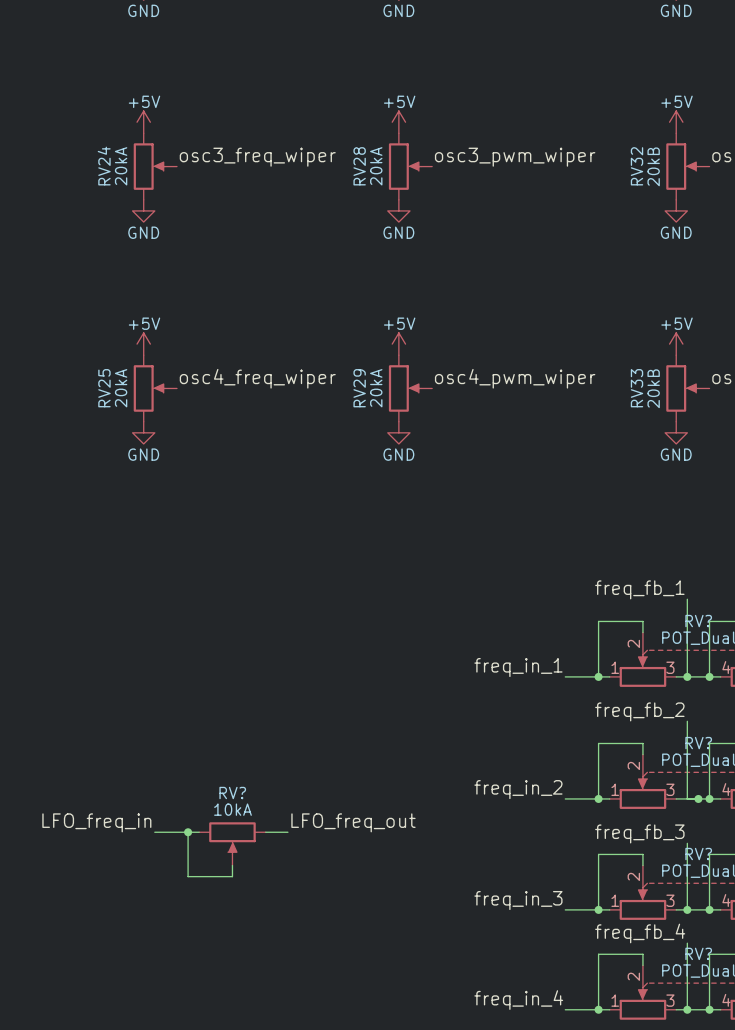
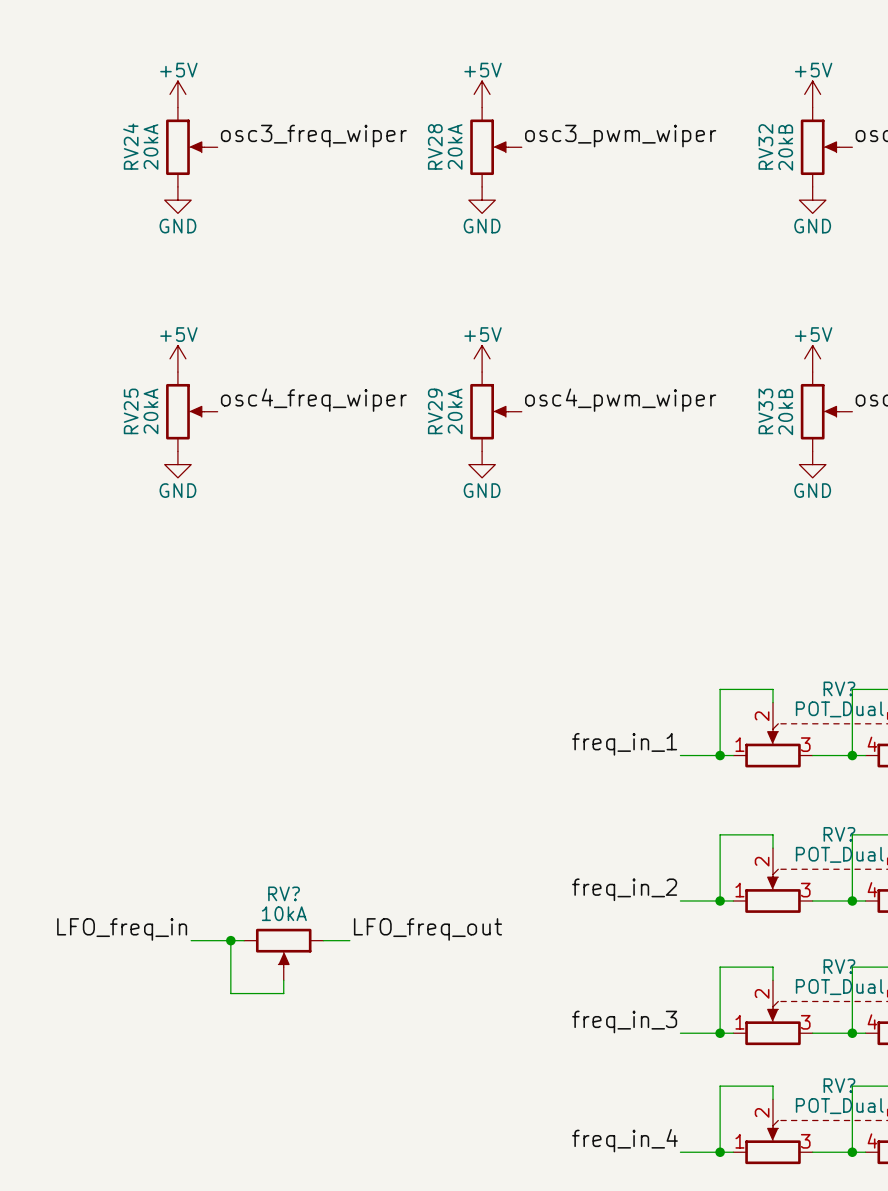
label: freq_fb_1 (639, 589) -> none
wire: (687, 599) (687, 676) -> none
junction: (687, 676) -> none
label: freq_fb_2 (639, 711) -> none
wire: (687, 721) (687, 798) -> none
junction: (698, 798) -> none
label: freq_fb_3 (639, 833) -> none
wire: (687, 843) (687, 909) -> none
junction: (687, 909) -> none
label: freq_fb_4 (640, 933) -> none
wire: (687, 943) (687, 1009) -> none
junction: (687, 1009) -> none

